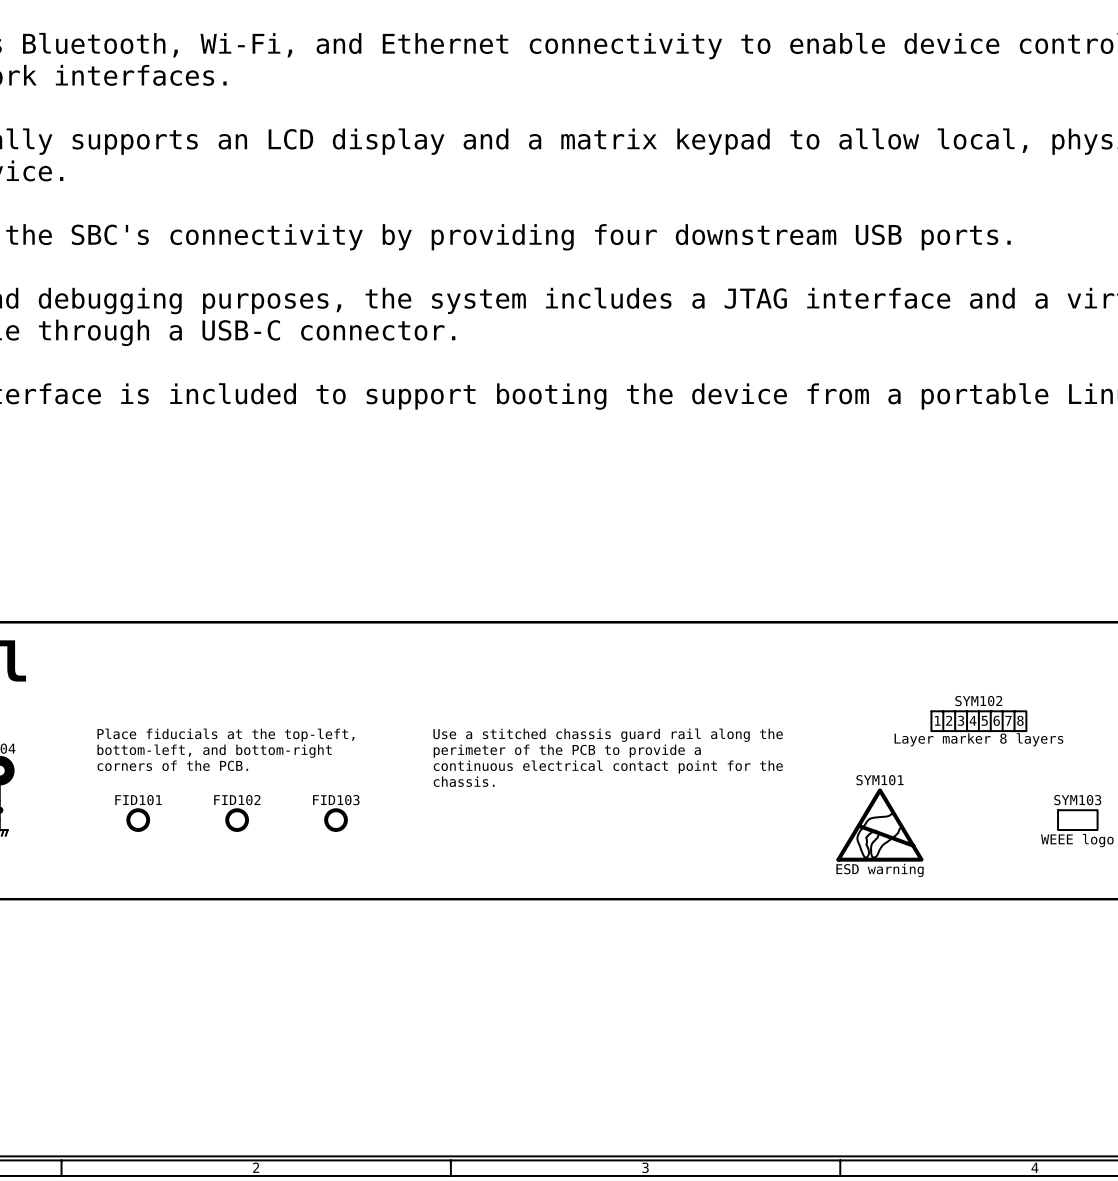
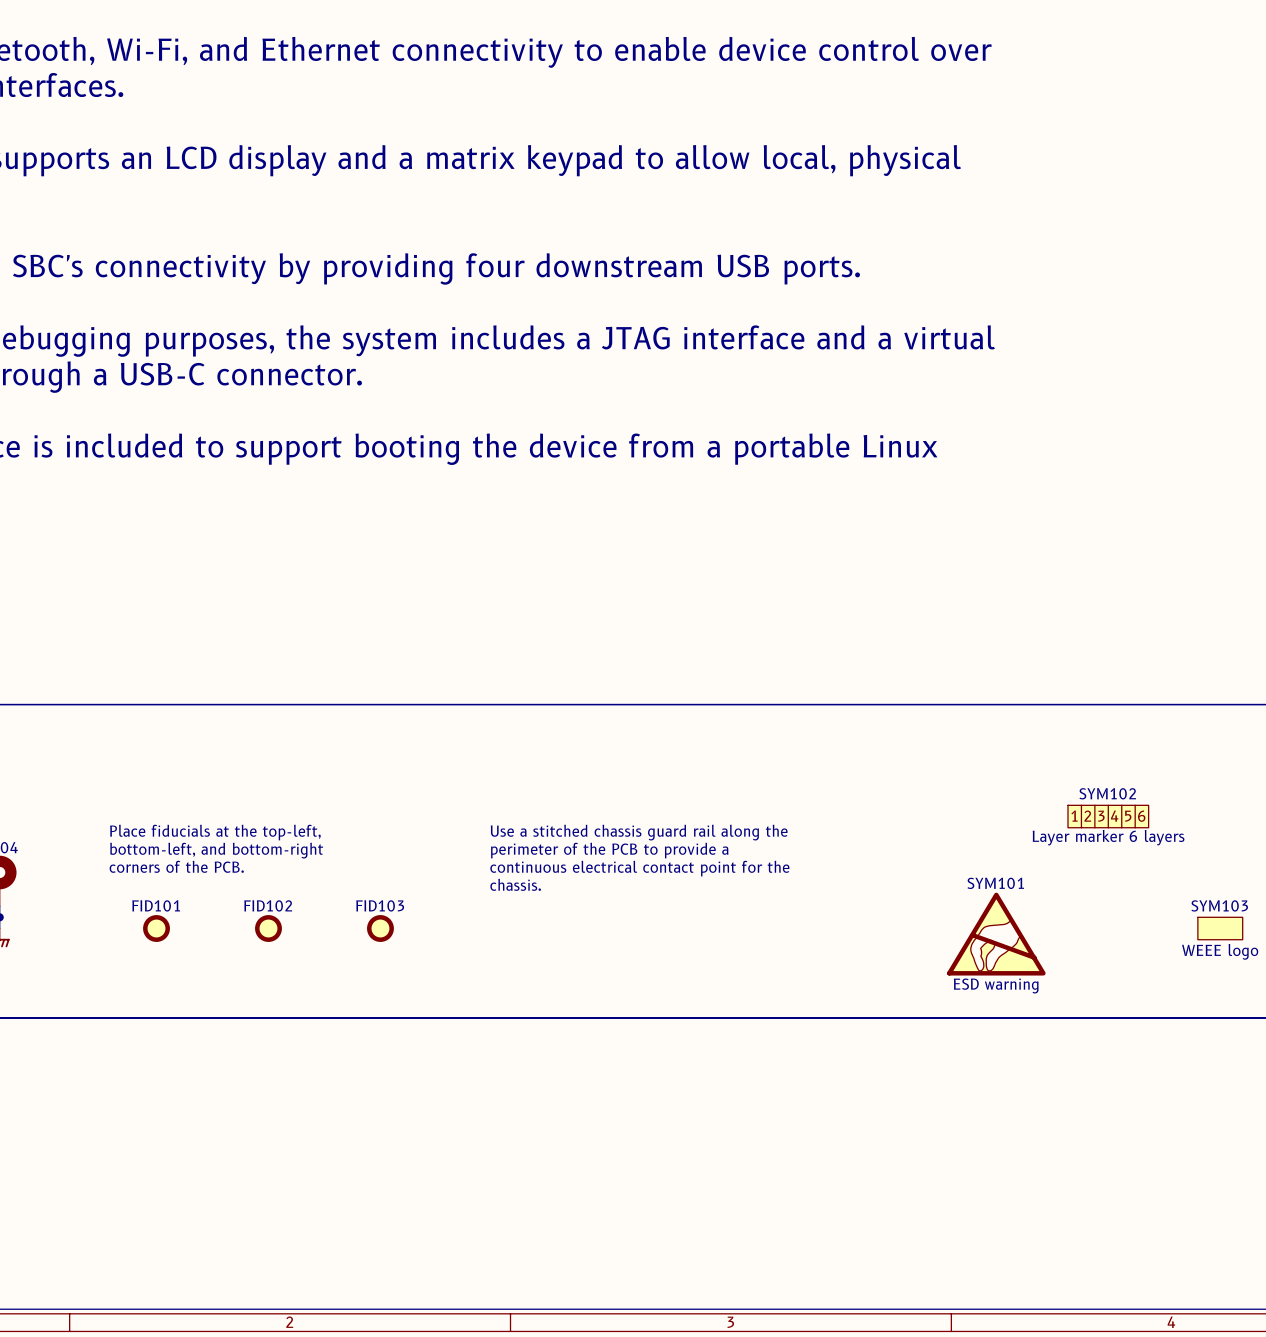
SYM102 symbol: [931, 711, 1027, 732] -> [1068, 805, 1149, 828]
SYM102 value: Layer marker 8 layers (978, 739) -> Layer marker 6 layers (1108, 837)

